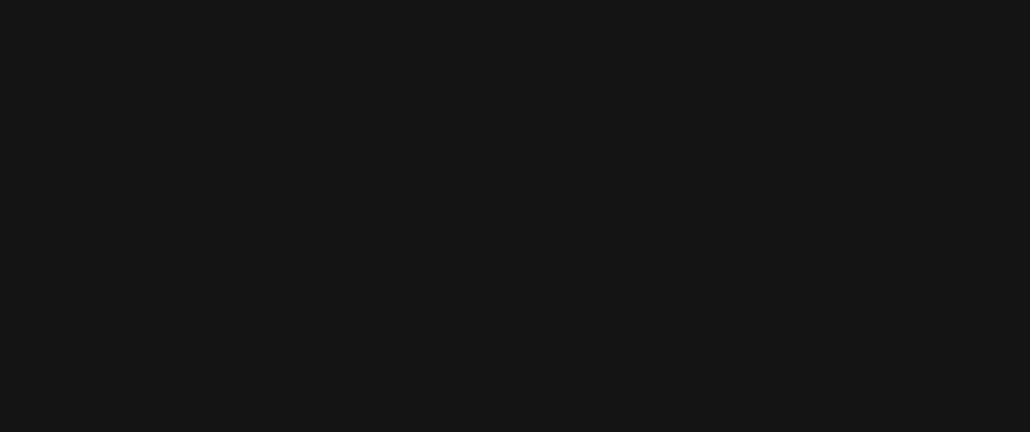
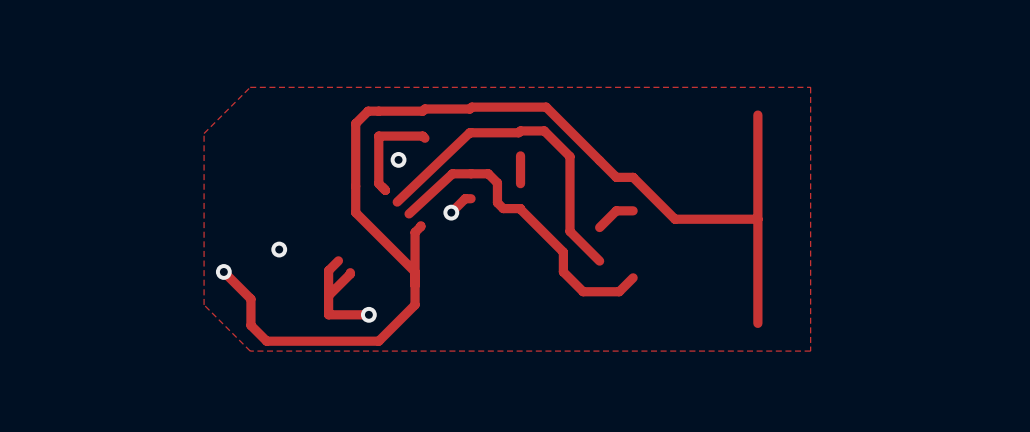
zone outline: none -> (250, 87) (204, 133) (204, 304) (250, 351) (810, 351) (810, 87) (250, 87)
track: none -> (757, 115) (757, 323)
track: none -> (424, 138) (422, 136) (378, 136) (378, 183) (385, 190)
track: none -> (520, 155) (520, 183)
via: none -> (398, 159)
track: none -> (471, 198) (465, 198) (451, 212)
track: none -> (397, 202) (469, 132) (544, 130) (569, 156) (569, 231) (599, 261)
track: none -> (633, 210) (616, 210) (599, 227)
via: none -> (451, 212)
track: none -> (409, 213) (452, 173) (488, 173) (497, 182) (497, 202) (503, 208) (520, 208) (563, 252) (563, 271) (583, 291) (619, 291) (633, 277)
track: none -> (757, 219) (675, 219) (633, 177) (616, 177) (546, 107) (471, 107) (469, 109) (424, 109) (422, 111) (368, 111) (355, 123) (355, 212) (415, 271)
track: none -> (420, 225) (415, 232) (415, 304) (378, 341) (266, 341) (250, 325) (250, 299) (223, 271)
via: none -> (279, 249)
track: none -> (338, 260) (328, 270) (328, 314) (368, 314)
via: none -> (223, 271)
track: none -> (350, 272) (328, 295)
via: none -> (368, 314)

